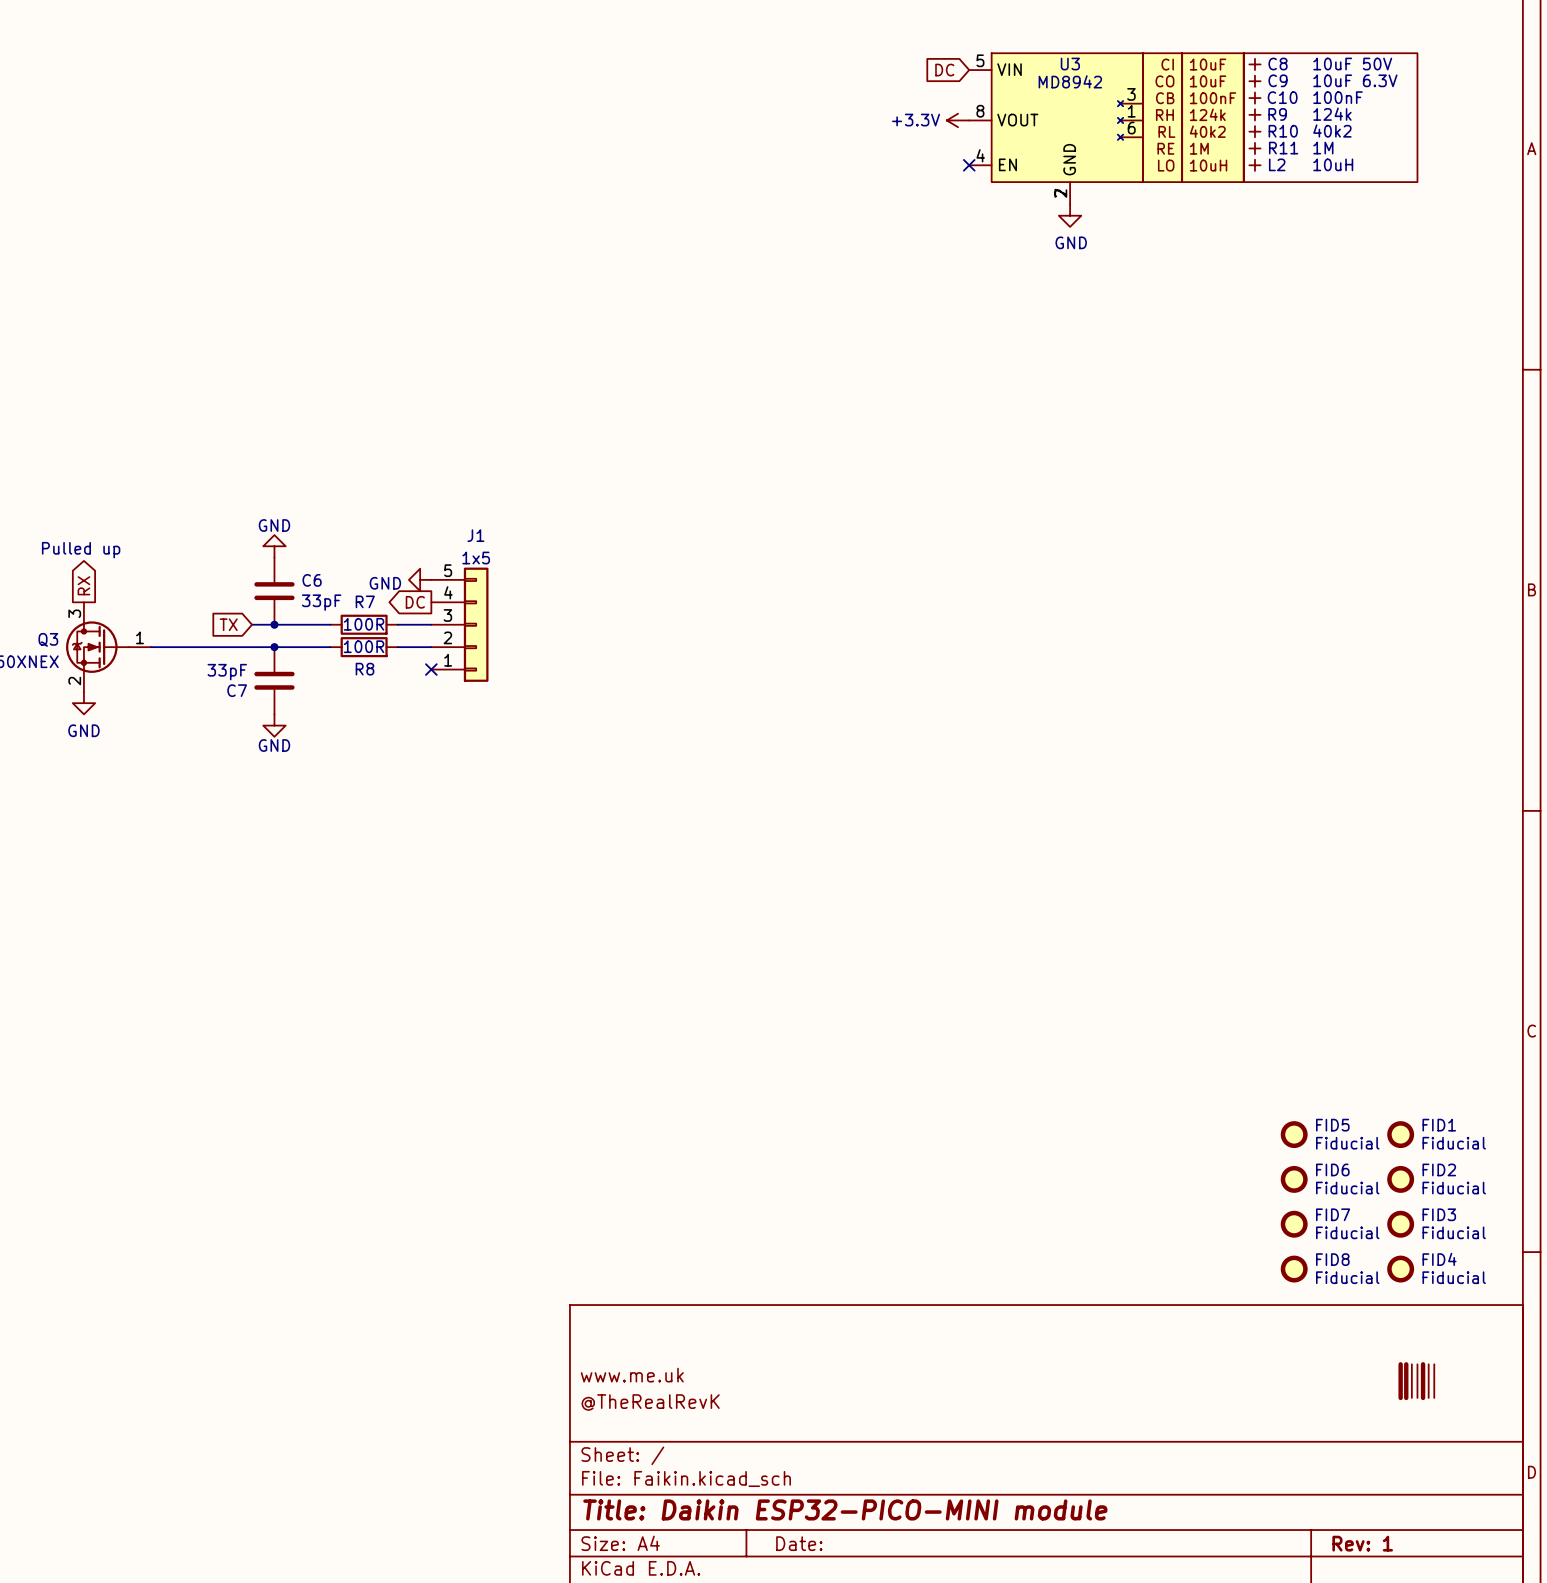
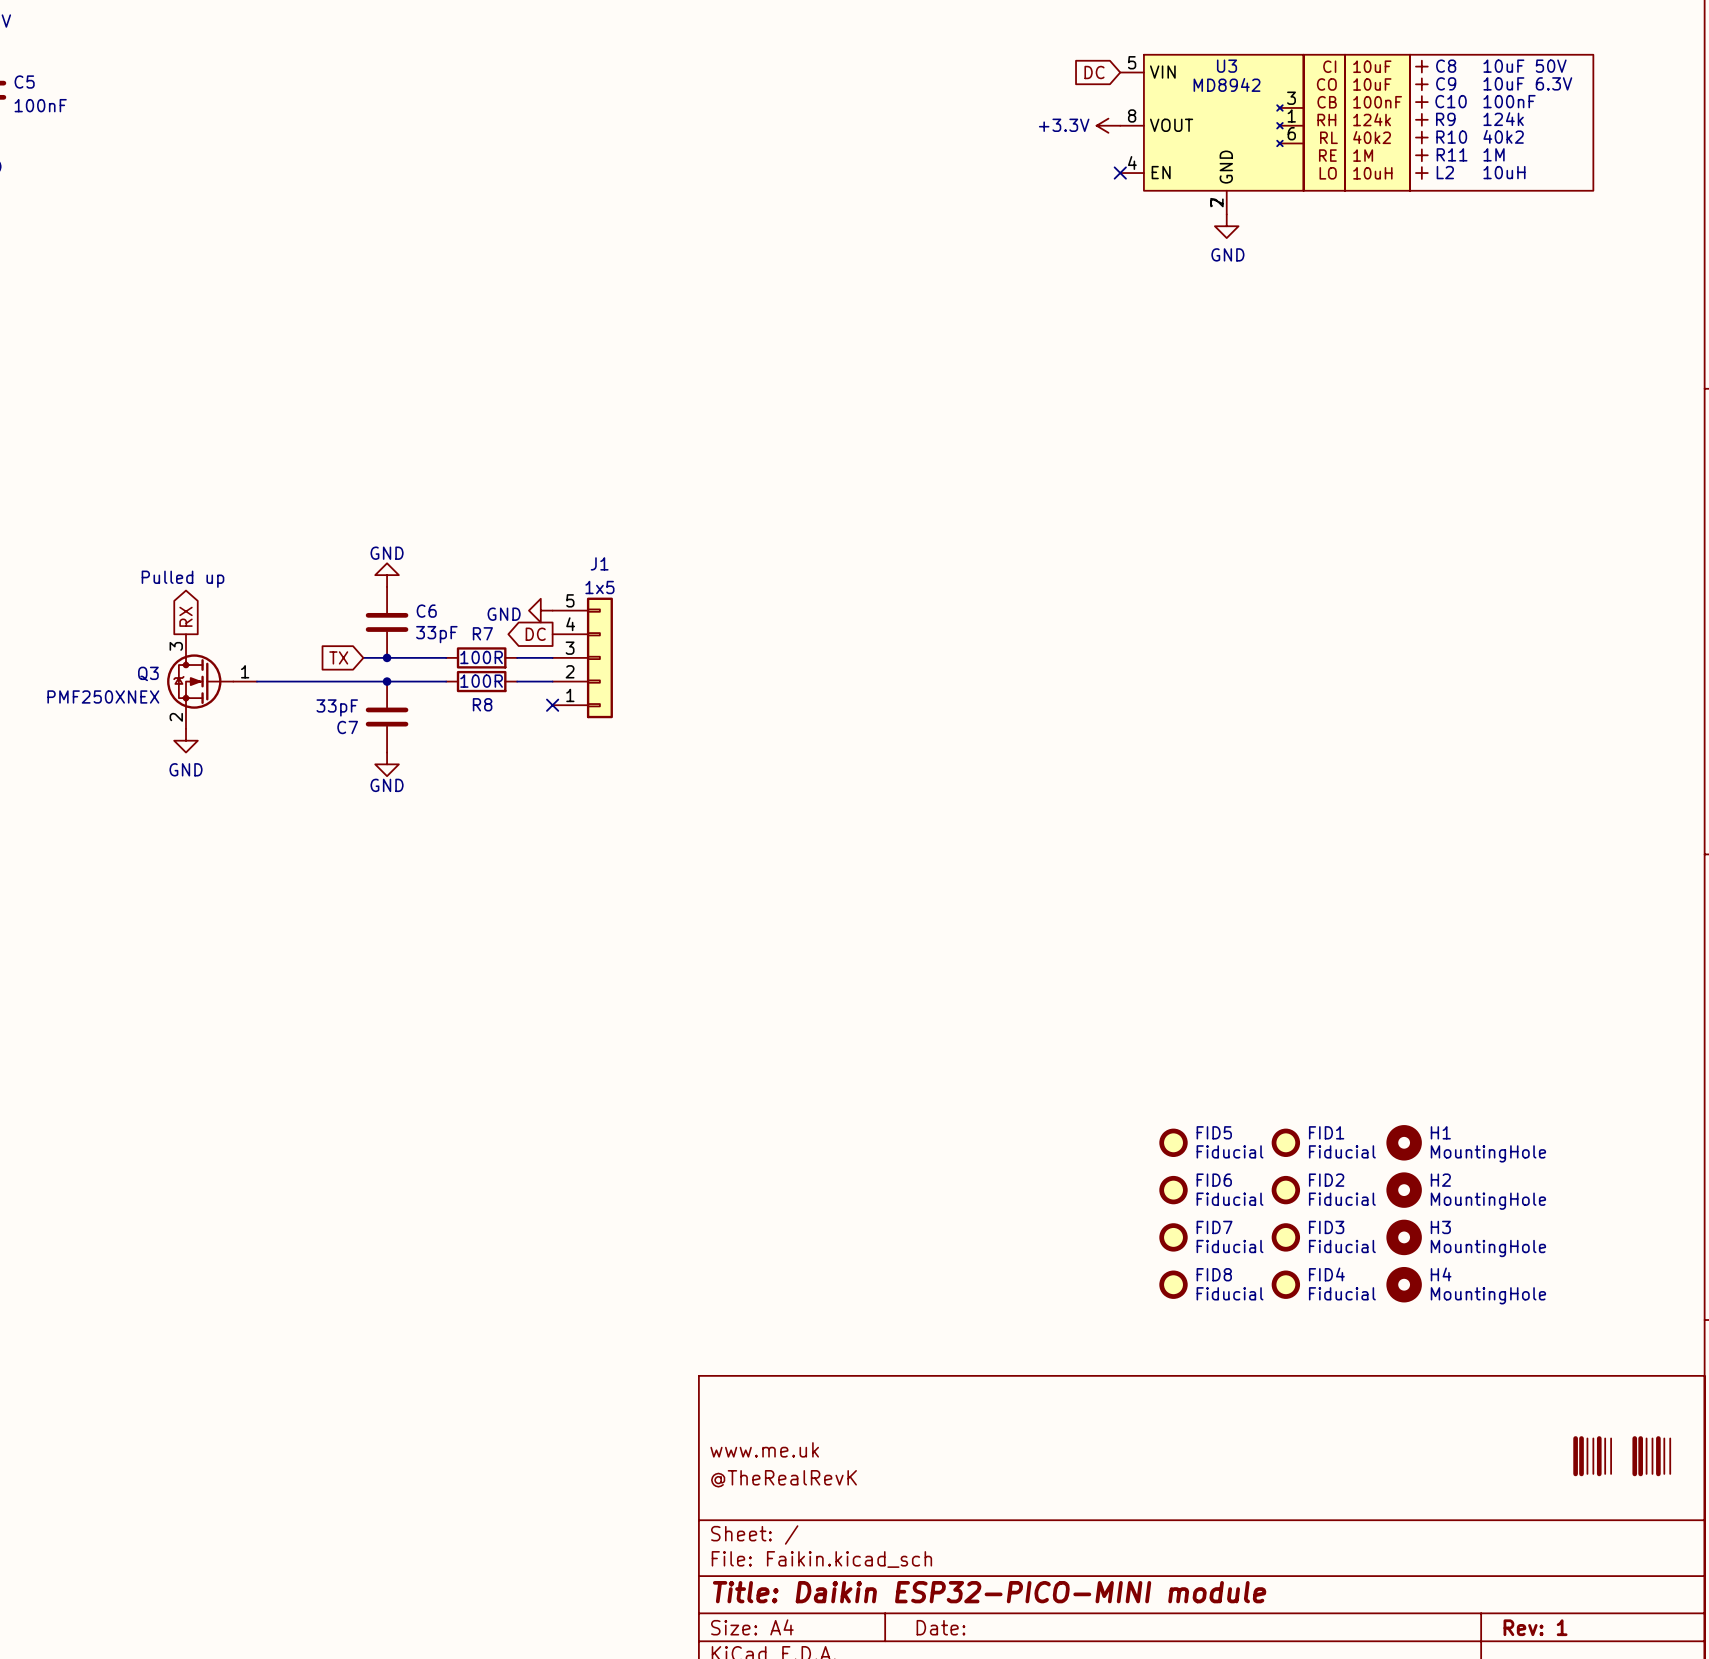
H1: none -> MountingHole (1404, 1142)
H2: none -> MountingHole (1404, 1190)
FID5 position: (1294, 1134) -> (1173, 1142)
FID1 position: (1400, 1134) -> (1285, 1142)
H3: none -> MountingHole (1404, 1237)
FID6 position: (1294, 1179) -> (1173, 1190)
FID2 position: (1400, 1179) -> (1285, 1190)
H4: none -> MountingHole (1404, 1284)
FID7 position: (1294, 1224) -> (1173, 1237)
FID3 position: (1400, 1224) -> (1285, 1237)
FID8 position: (1294, 1269) -> (1173, 1284)
FID4 position: (1400, 1269) -> (1285, 1284)
part: none -> (1651, 1456)

